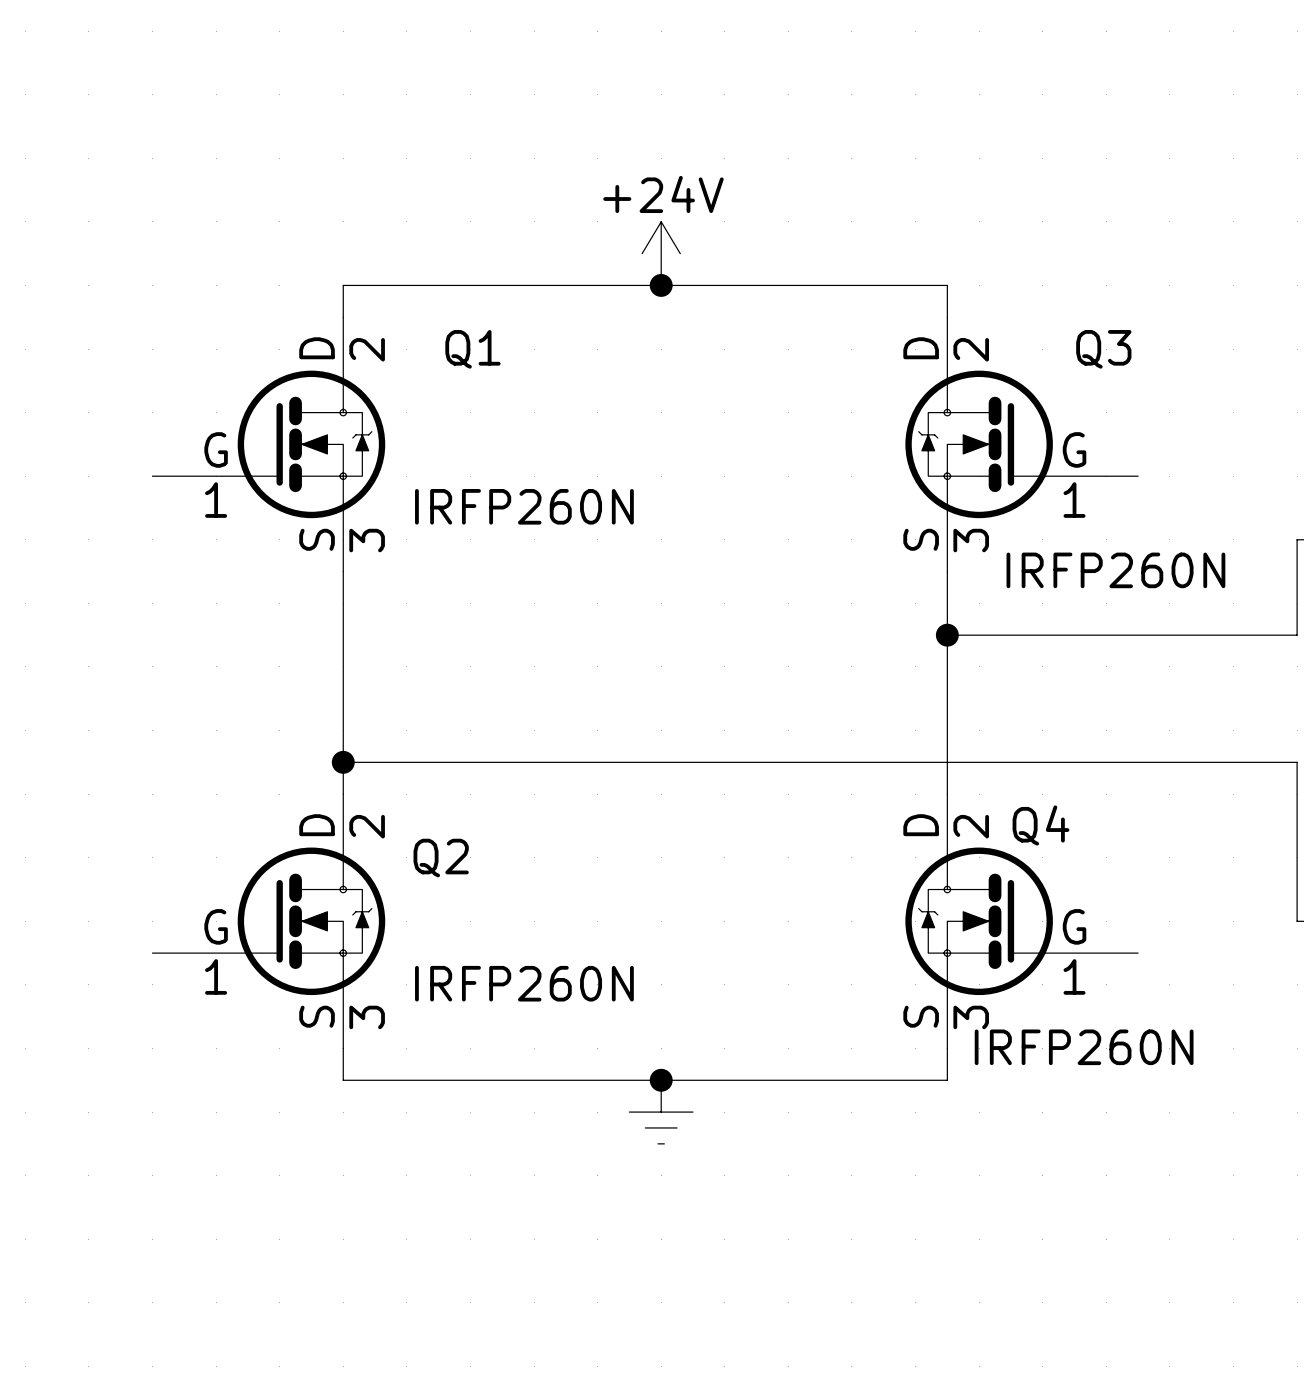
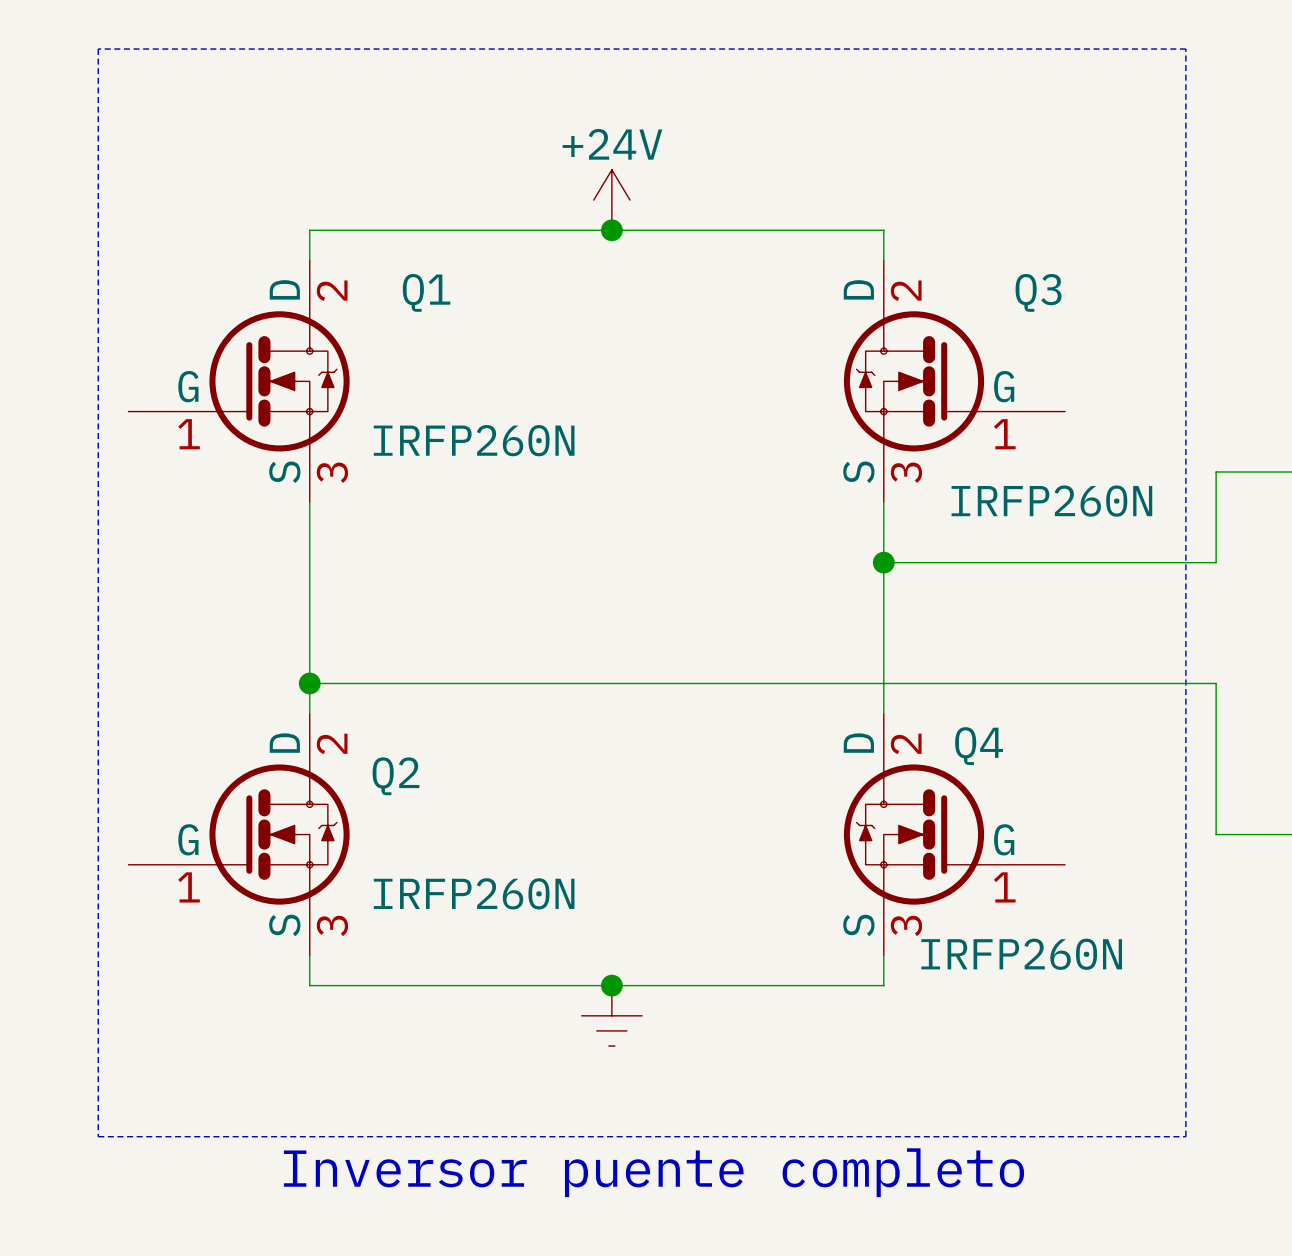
line: none -> (98, 49) (1185, 49) (1185, 1136) (98, 1136) (98, 49)
text: none -> Inversor puente completo (654, 1172)

